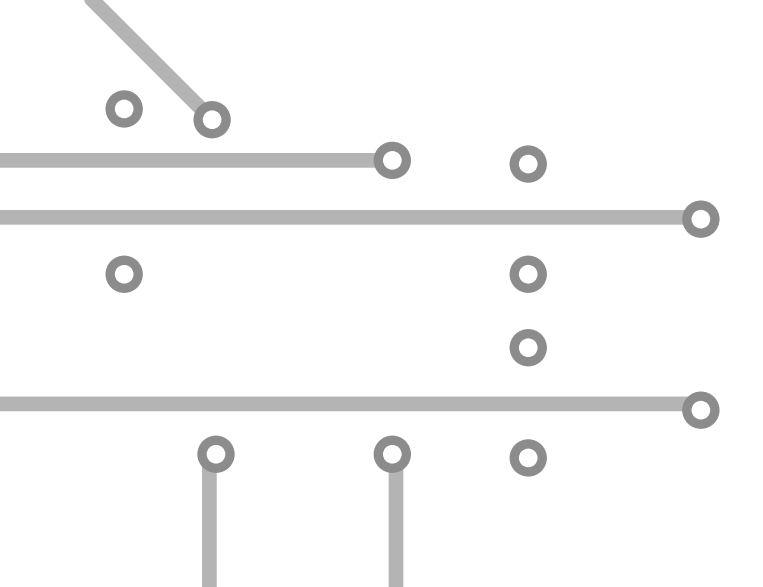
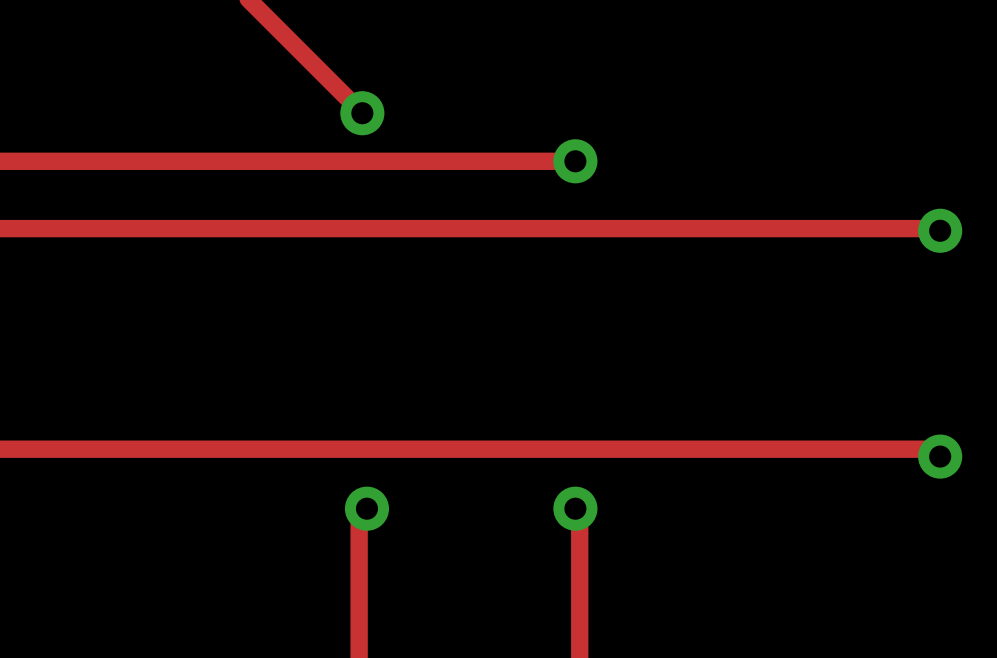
via: (124, 108) -> none
via: (528, 164) -> none
via: (124, 274) -> none
via: (528, 274) -> none
via: (528, 347) -> none
via: (528, 457) -> none

